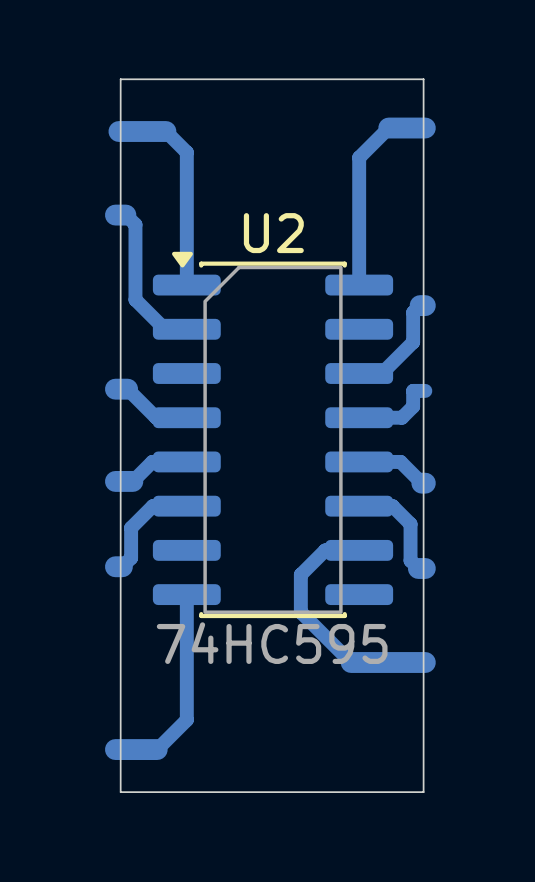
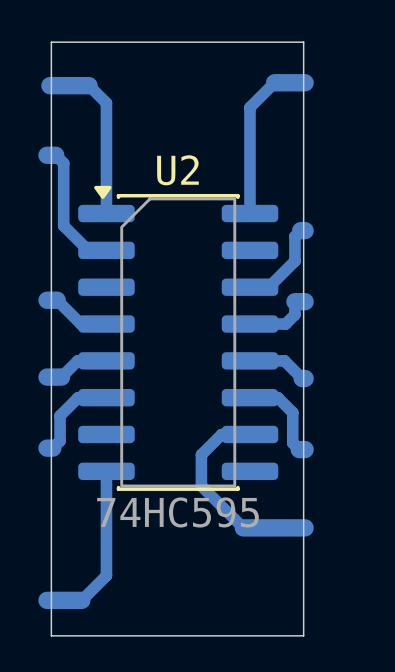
bottom track width: thin (425, 390) (413, 390) -> thick (305, 301) (294, 301)

